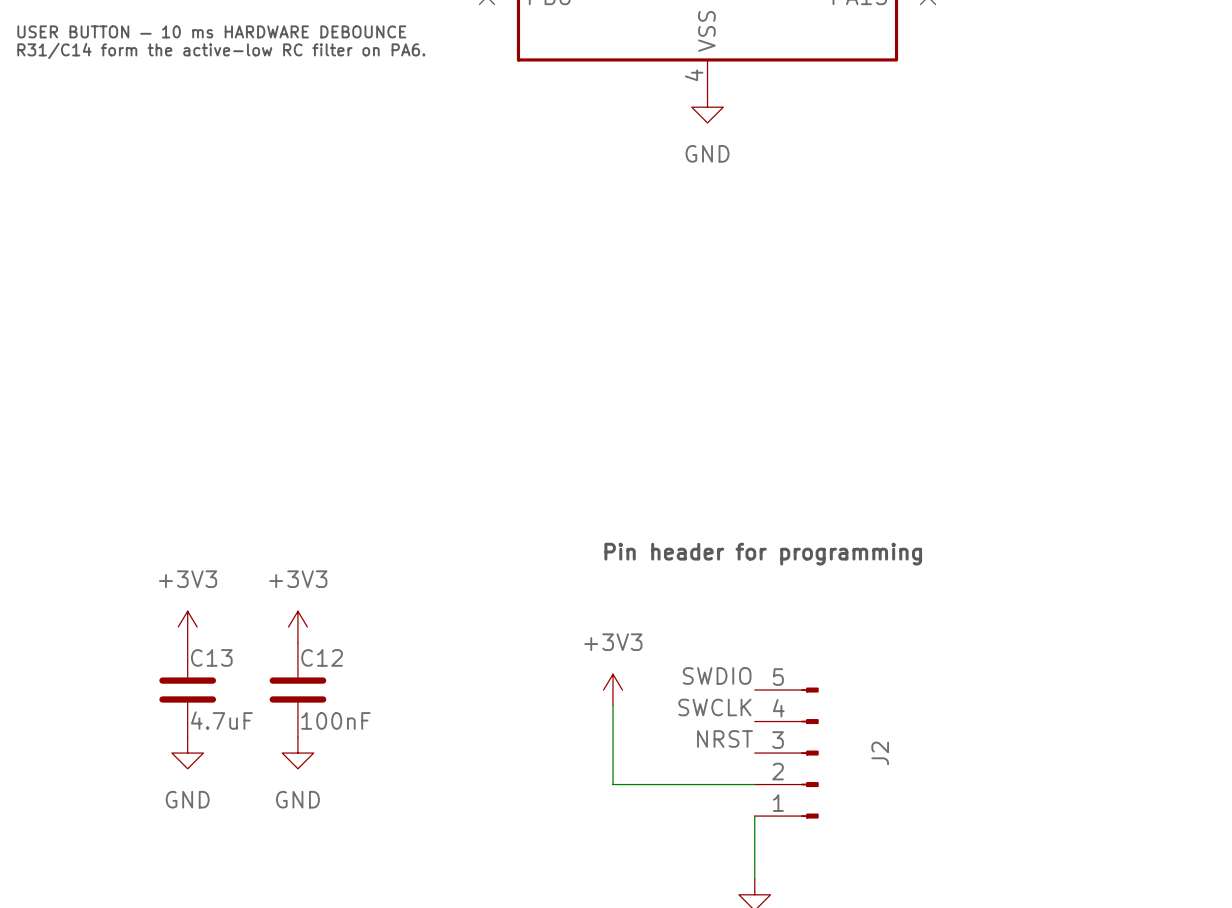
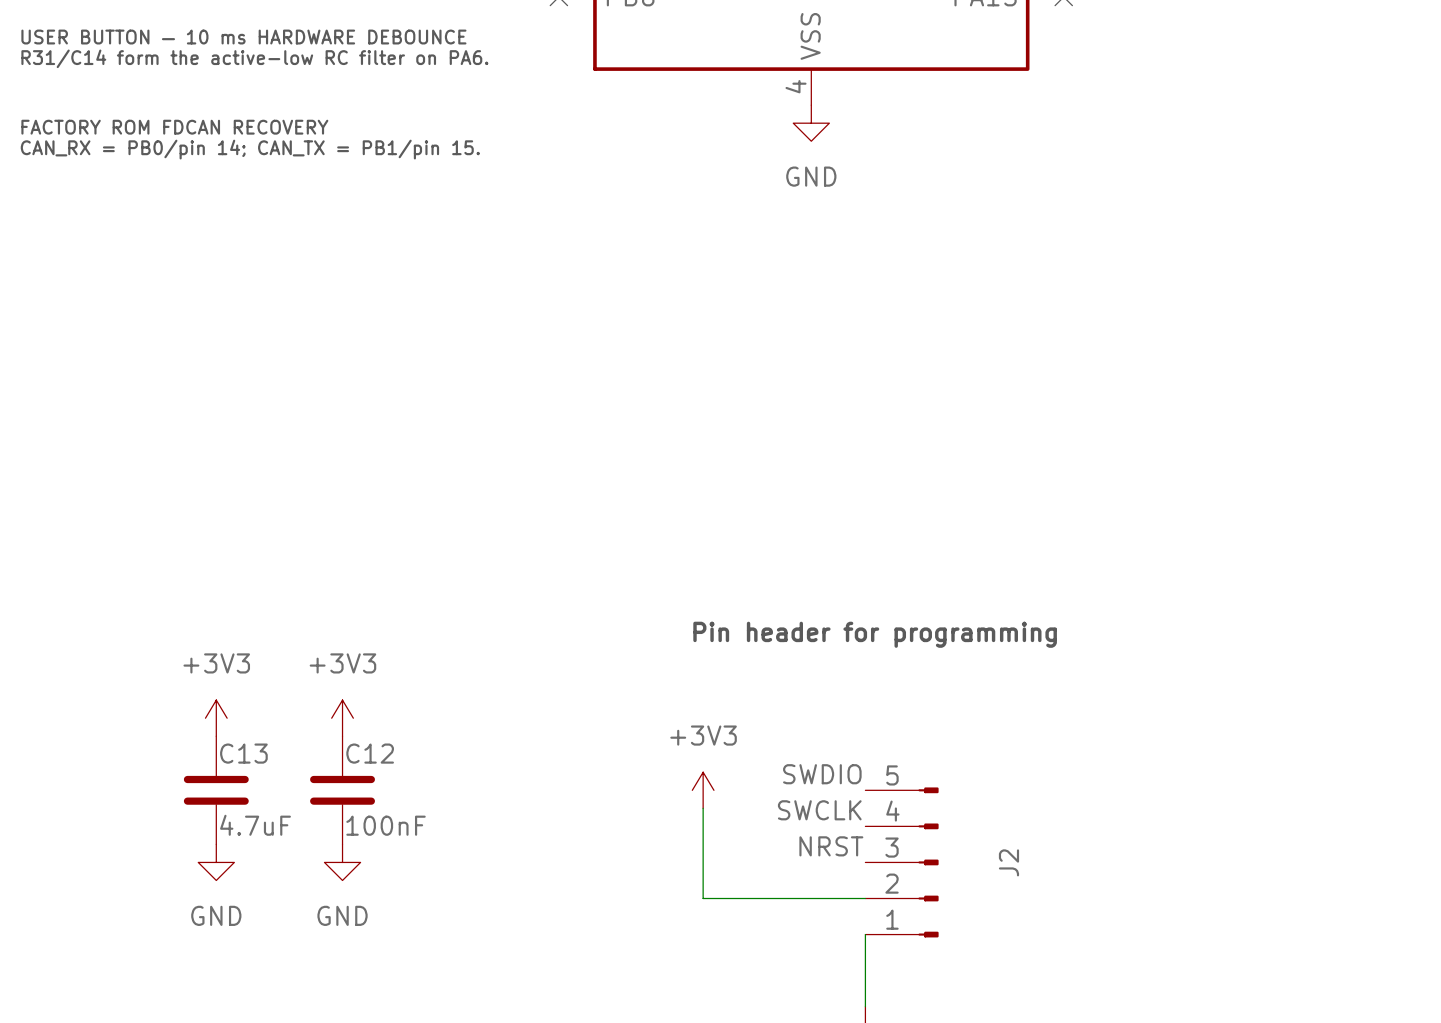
text: none -> FACTORY ROM FDCAN RECOVERY (174, 127)
text: none -> CAN_RX = PB0/pin 14; CAN_TX = PB1/pin 15. (250, 149)

